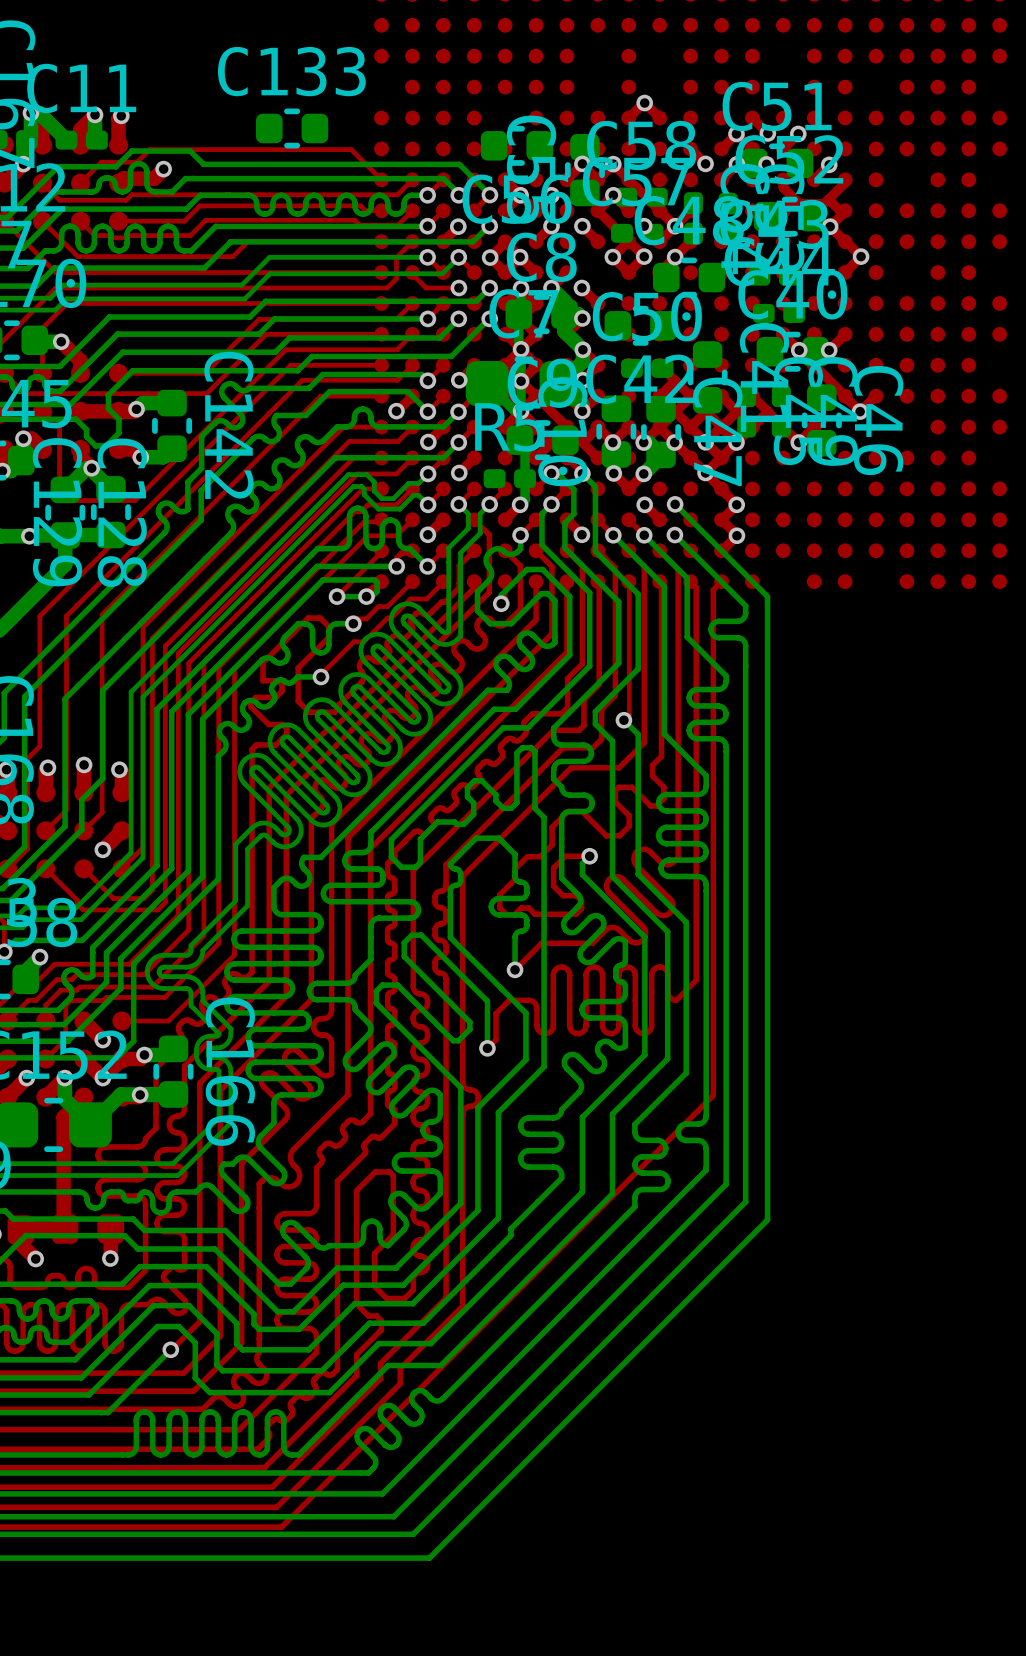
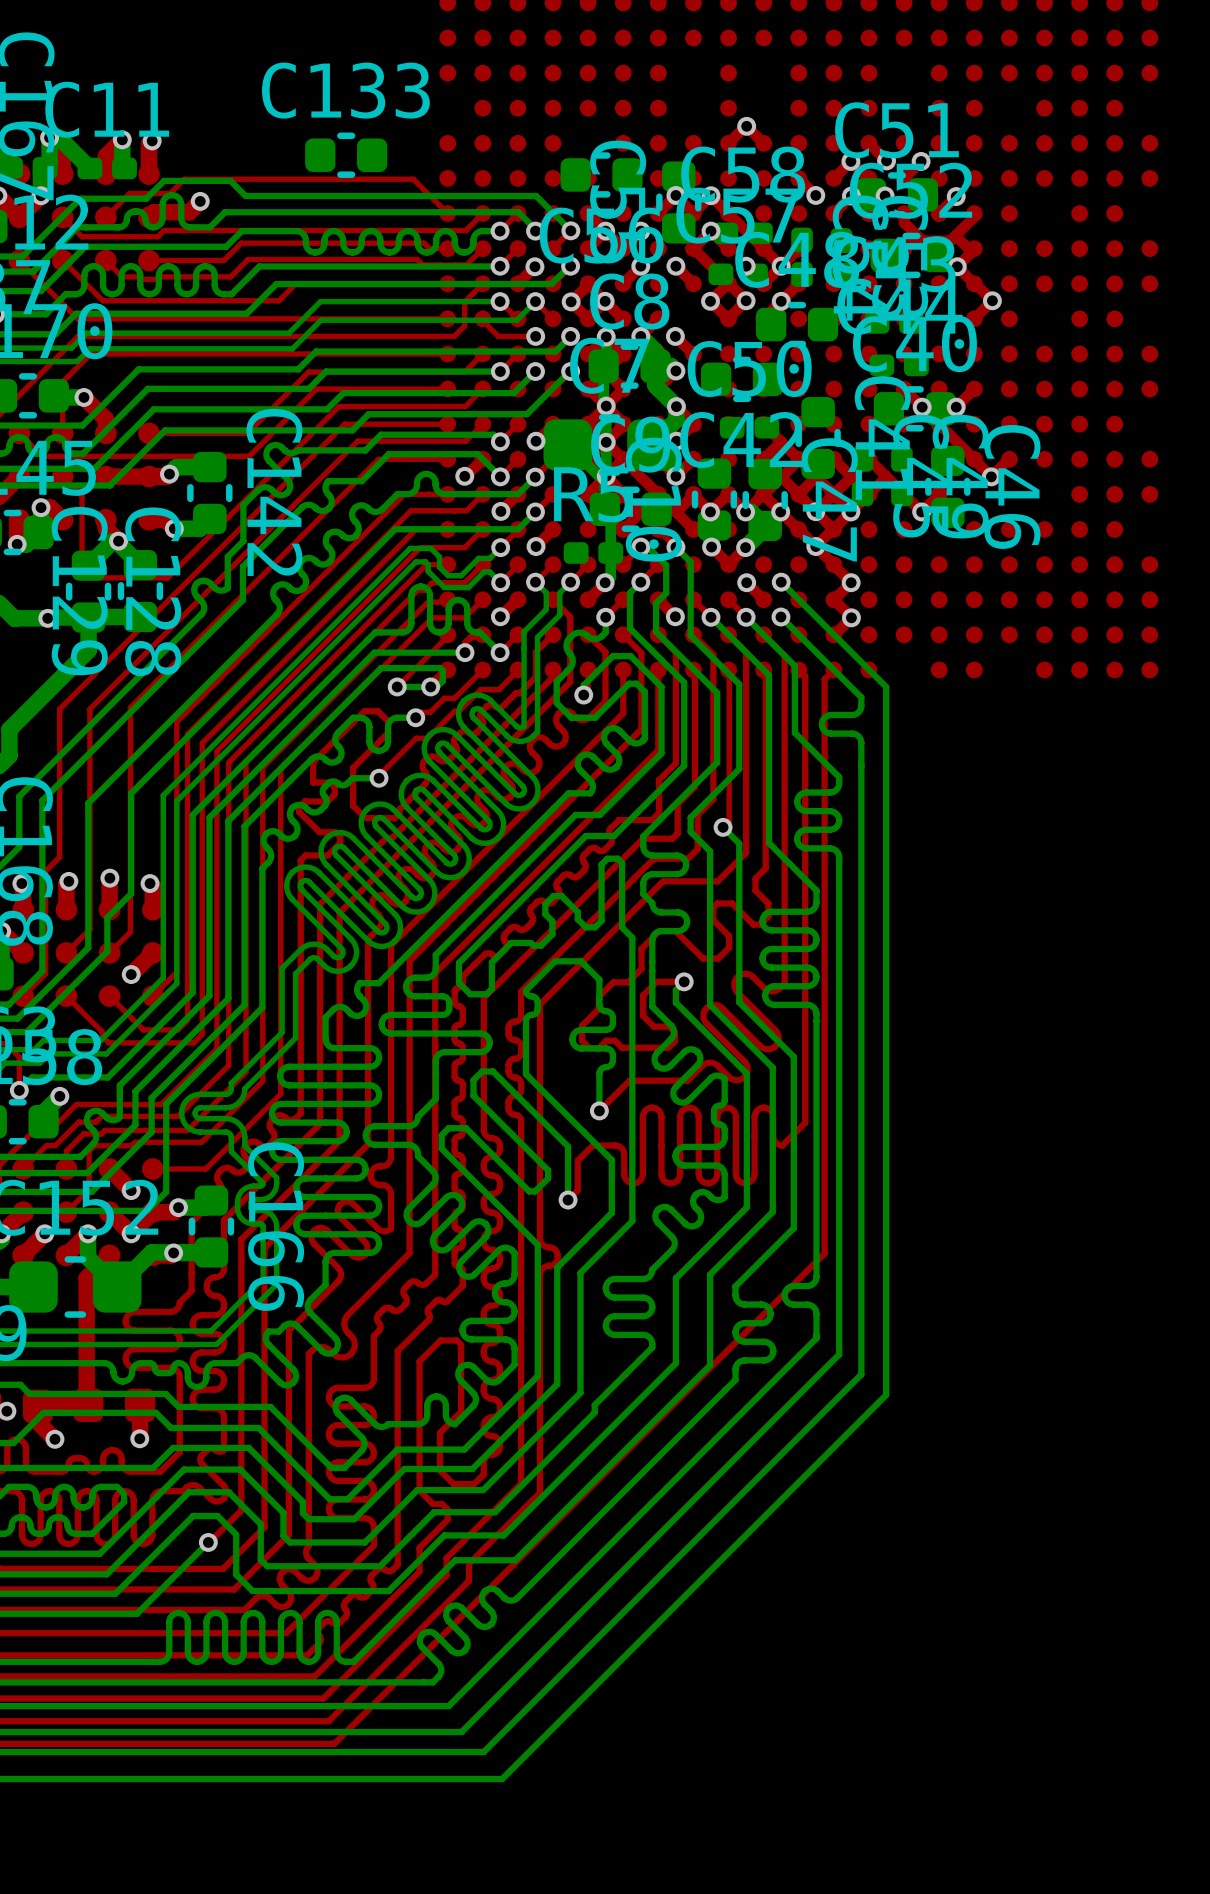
bottom track: (108, 395) (108, 408) (118, 419) (118, 433) (106, 445) (95, 445) (86, 436) (86, 429) (76, 419) -> (137, 458) (110, 485) (100, 485)

